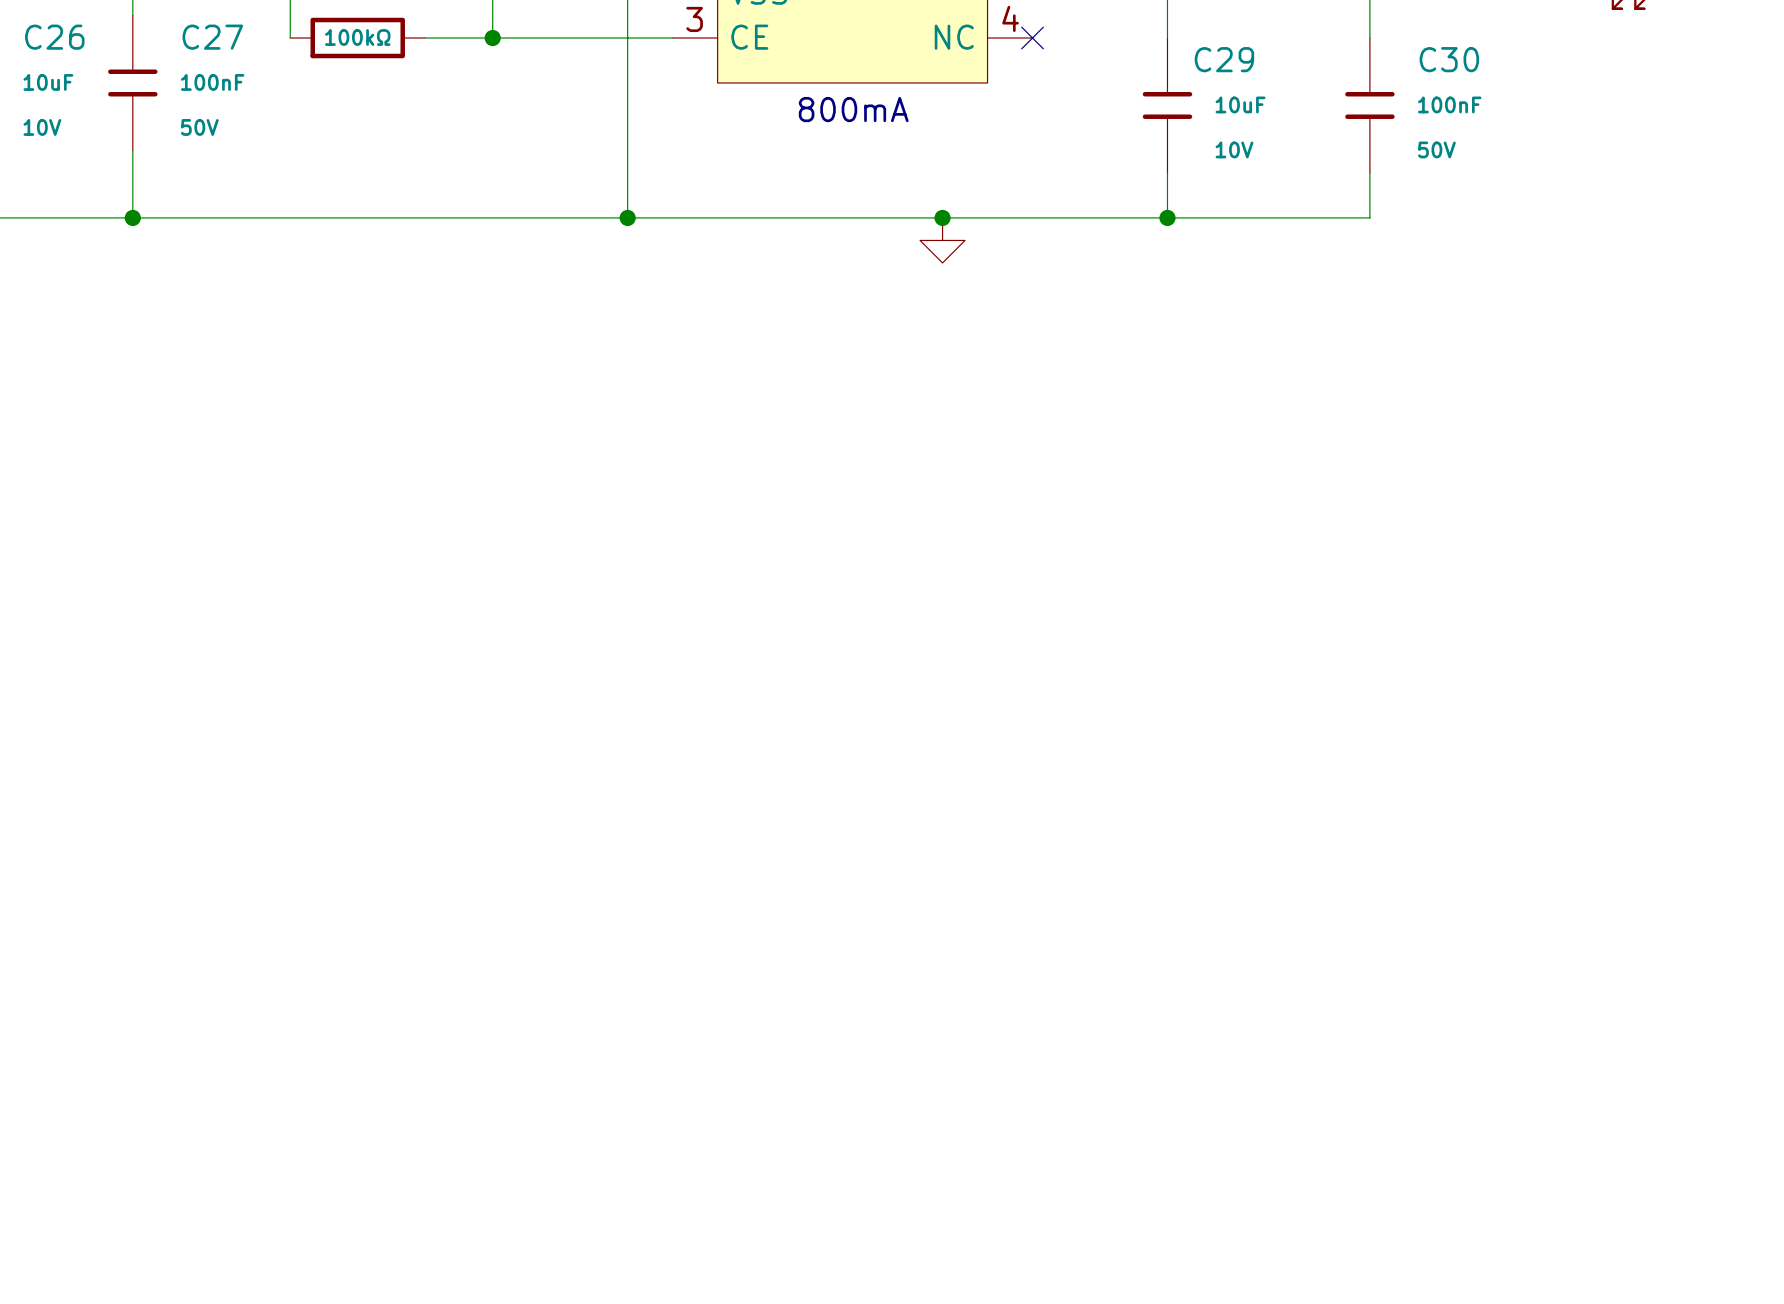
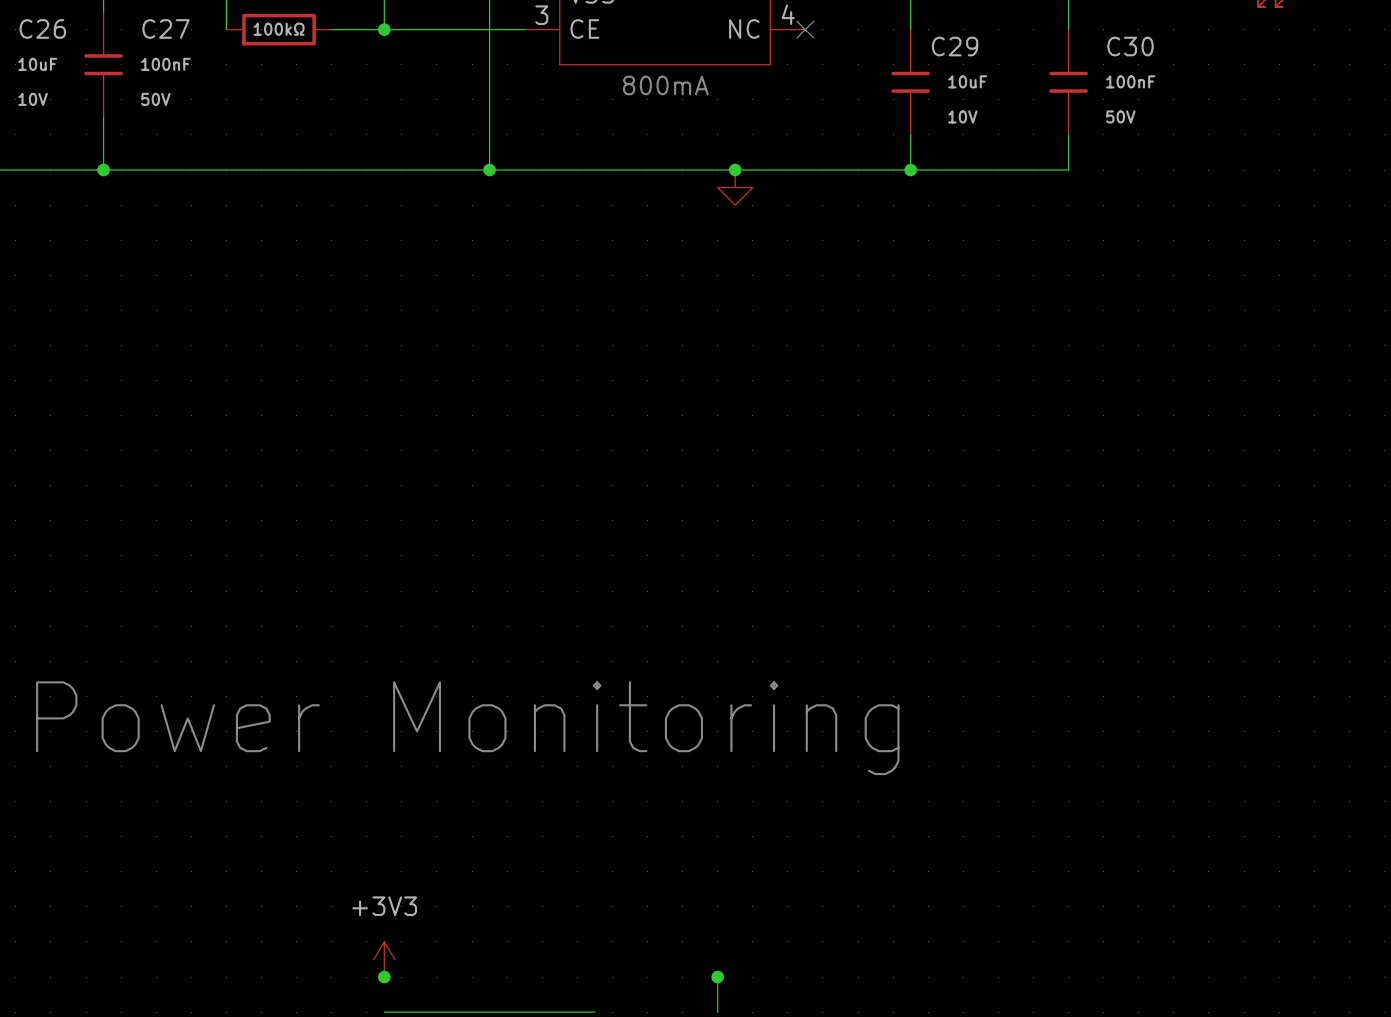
text: none -> Power Monitoring (467, 728)
power symbol: none -> +3V3 (384, 959)
junction: none -> (384, 977)
wire: none -> (717, 977) (717, 1012)
junction: none -> (717, 977)
wire: none -> (384, 1012) (594, 1012)

